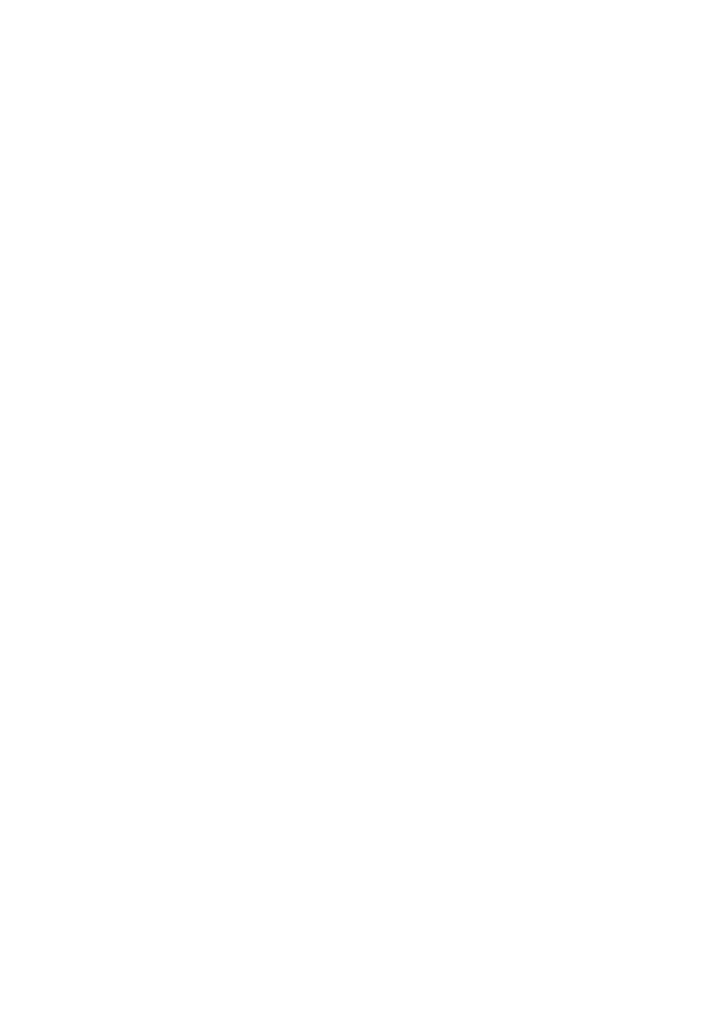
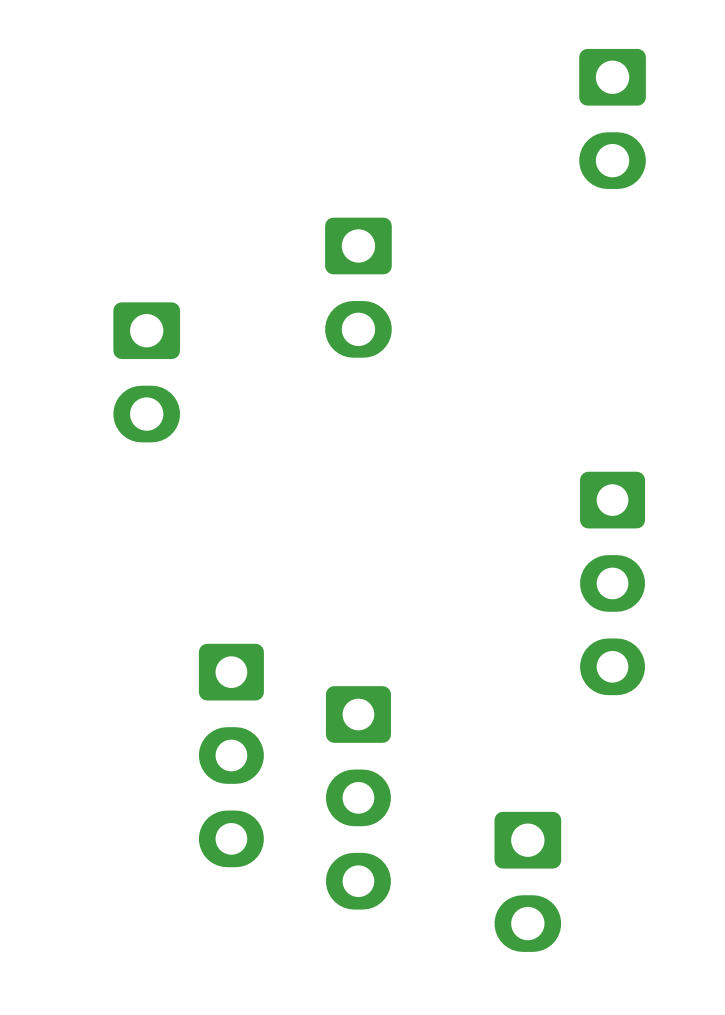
part: none -> (612, 118)
part: none -> (358, 287)
part: none -> (146, 372)
part: none -> (612, 583)
part: none -> (231, 755)
part: none -> (358, 797)
part: none -> (527, 881)

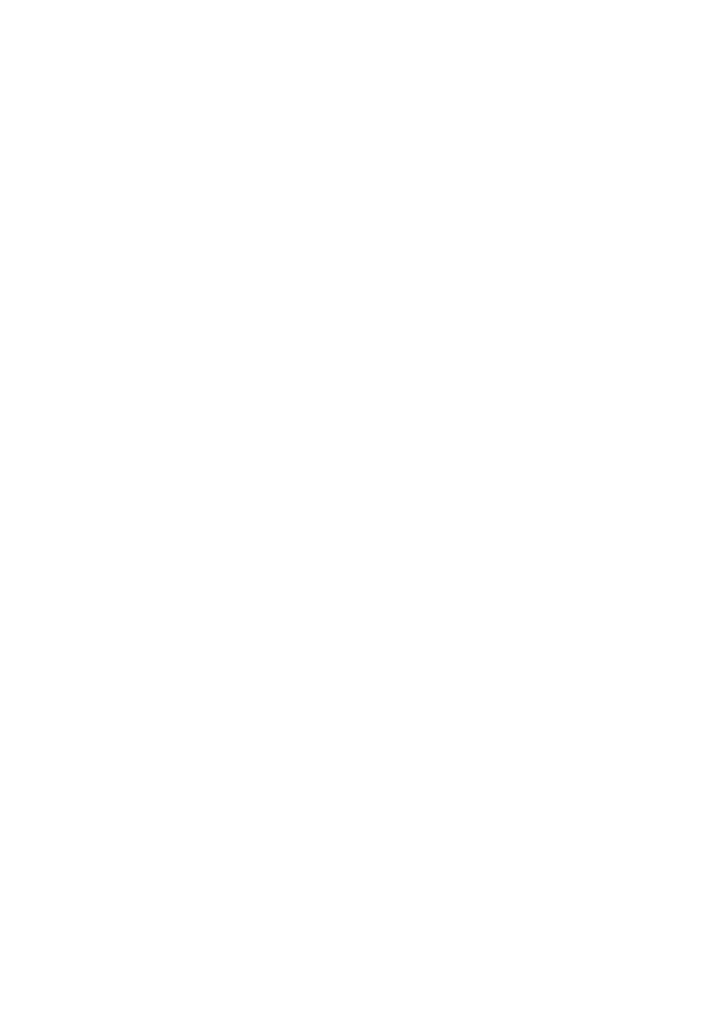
part: (612, 118) -> none
part: (358, 287) -> none
part: (146, 372) -> none
part: (612, 583) -> none
part: (231, 755) -> none
part: (358, 797) -> none
part: (527, 881) -> none

